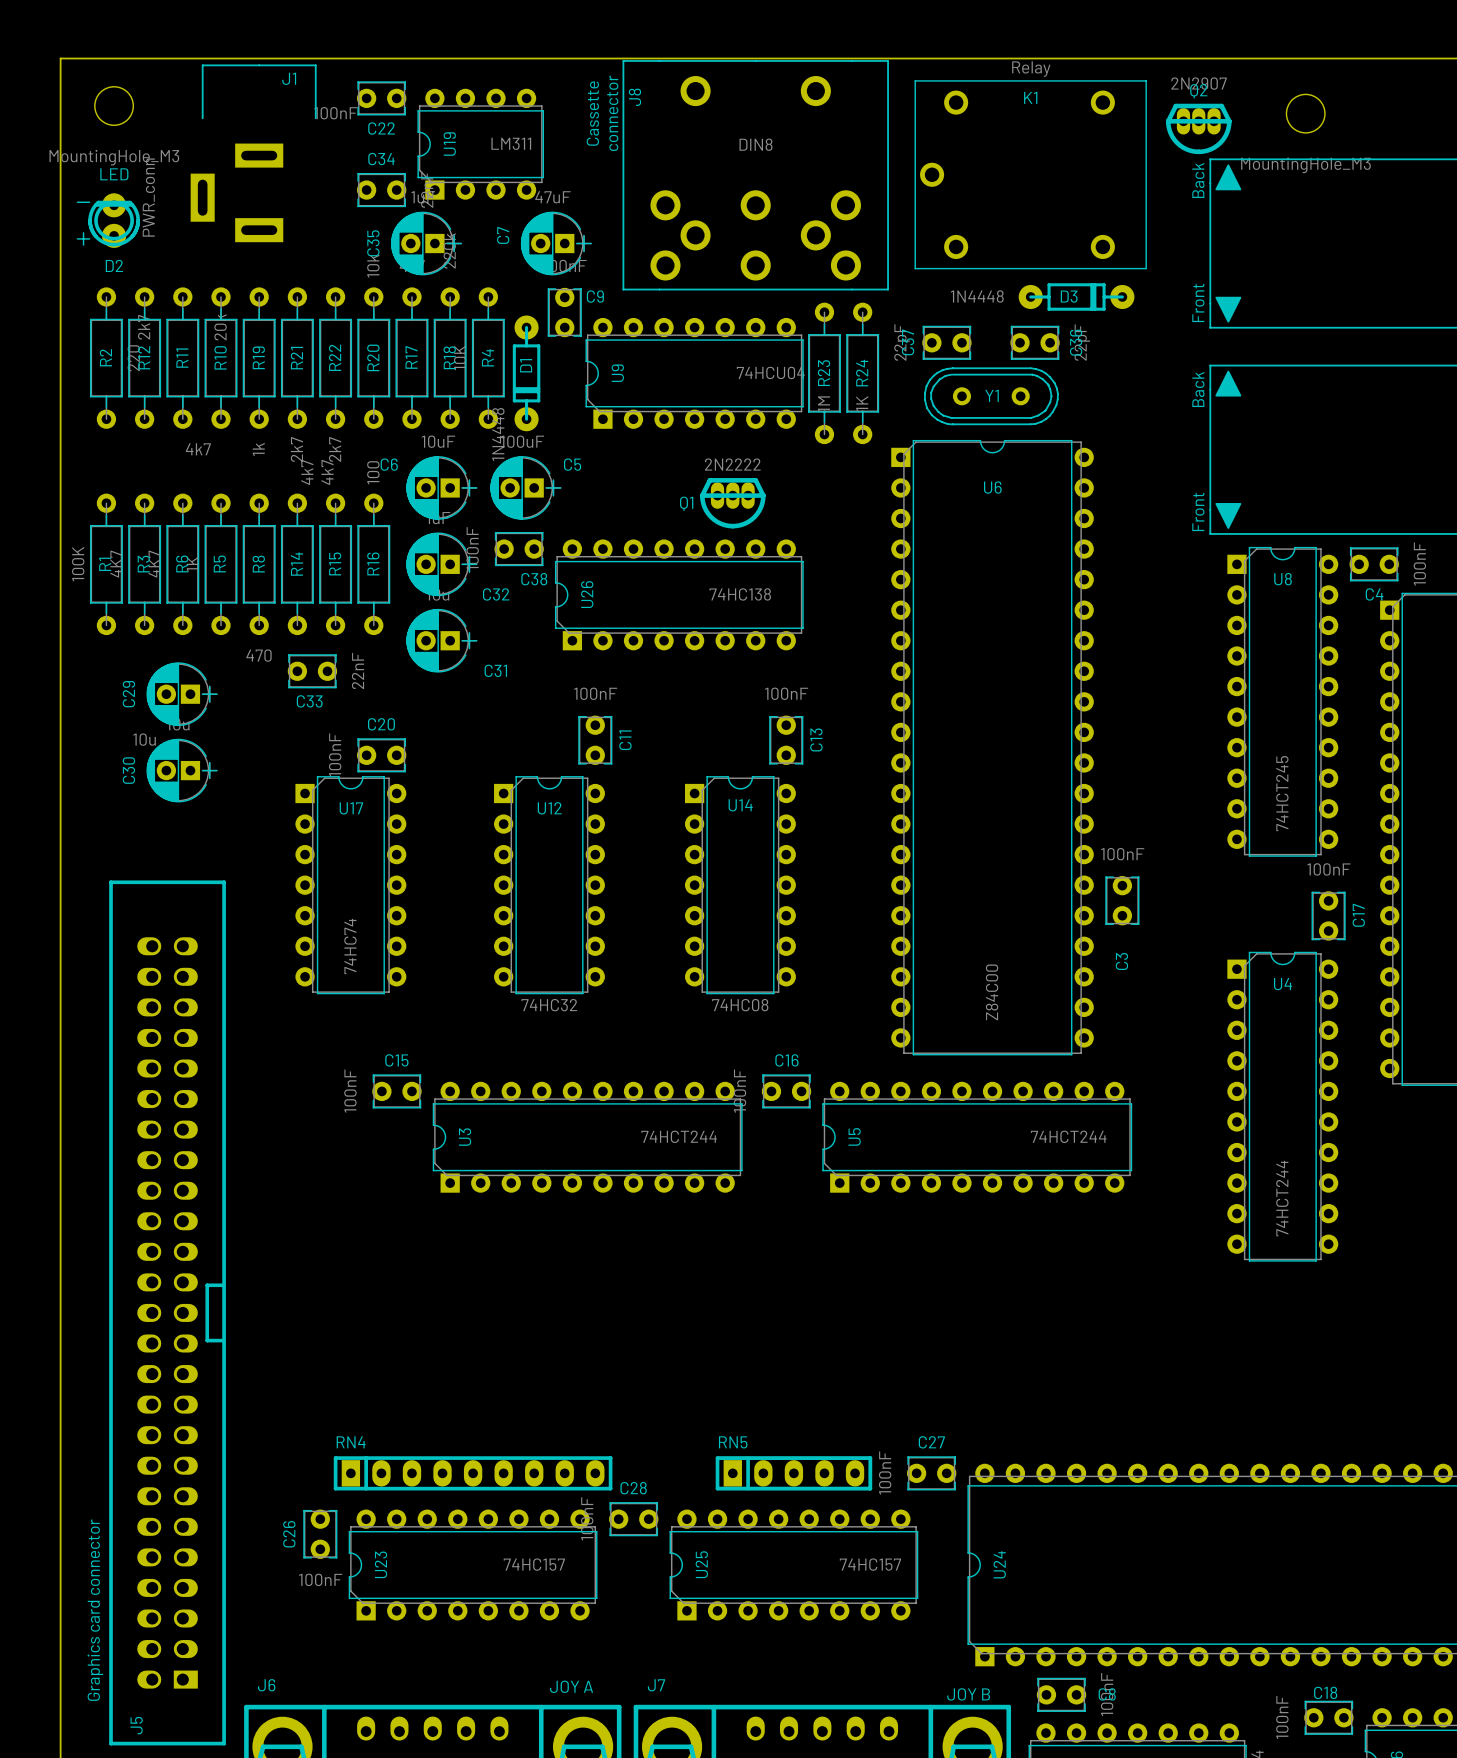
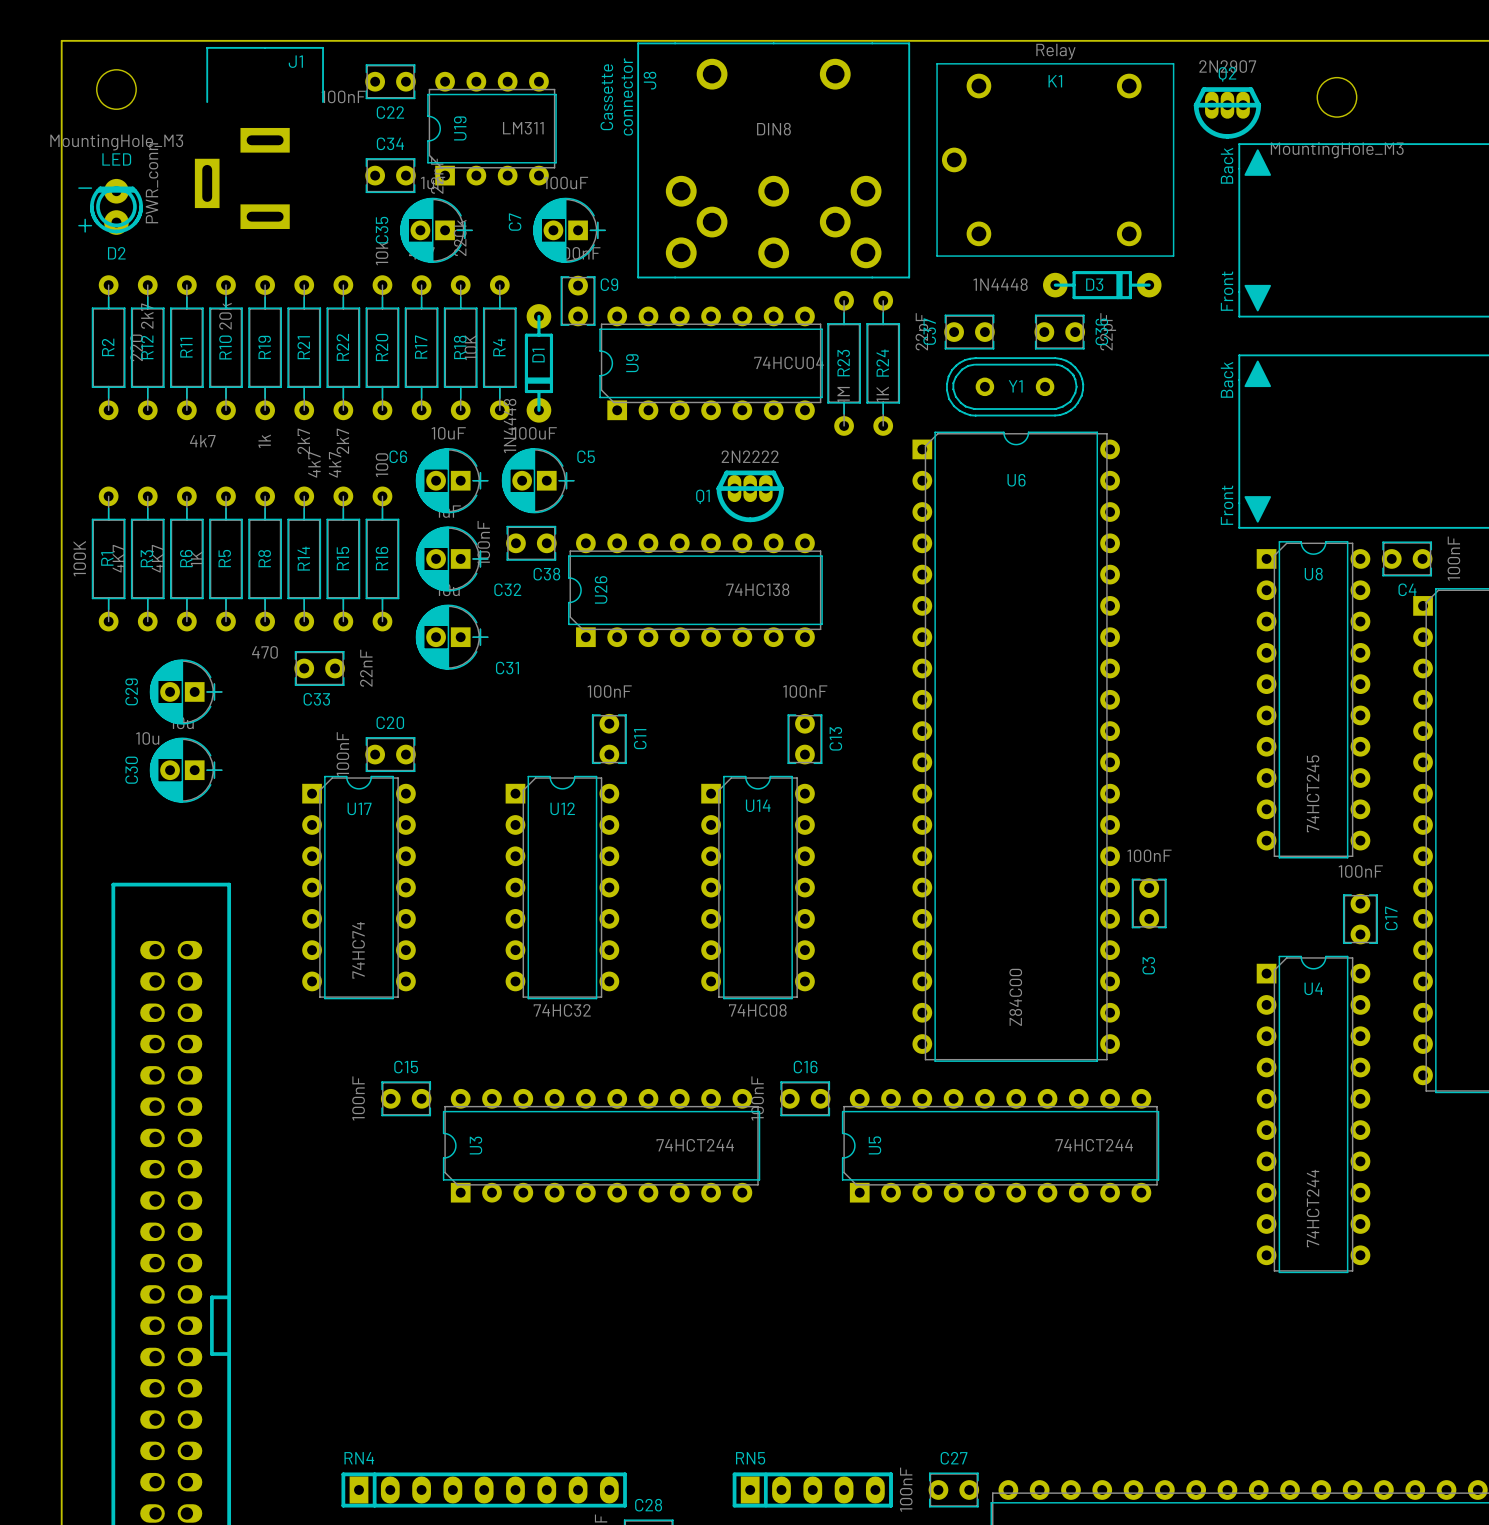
C7 value: 47uF (552, 197) -> 100uF (566, 182)

